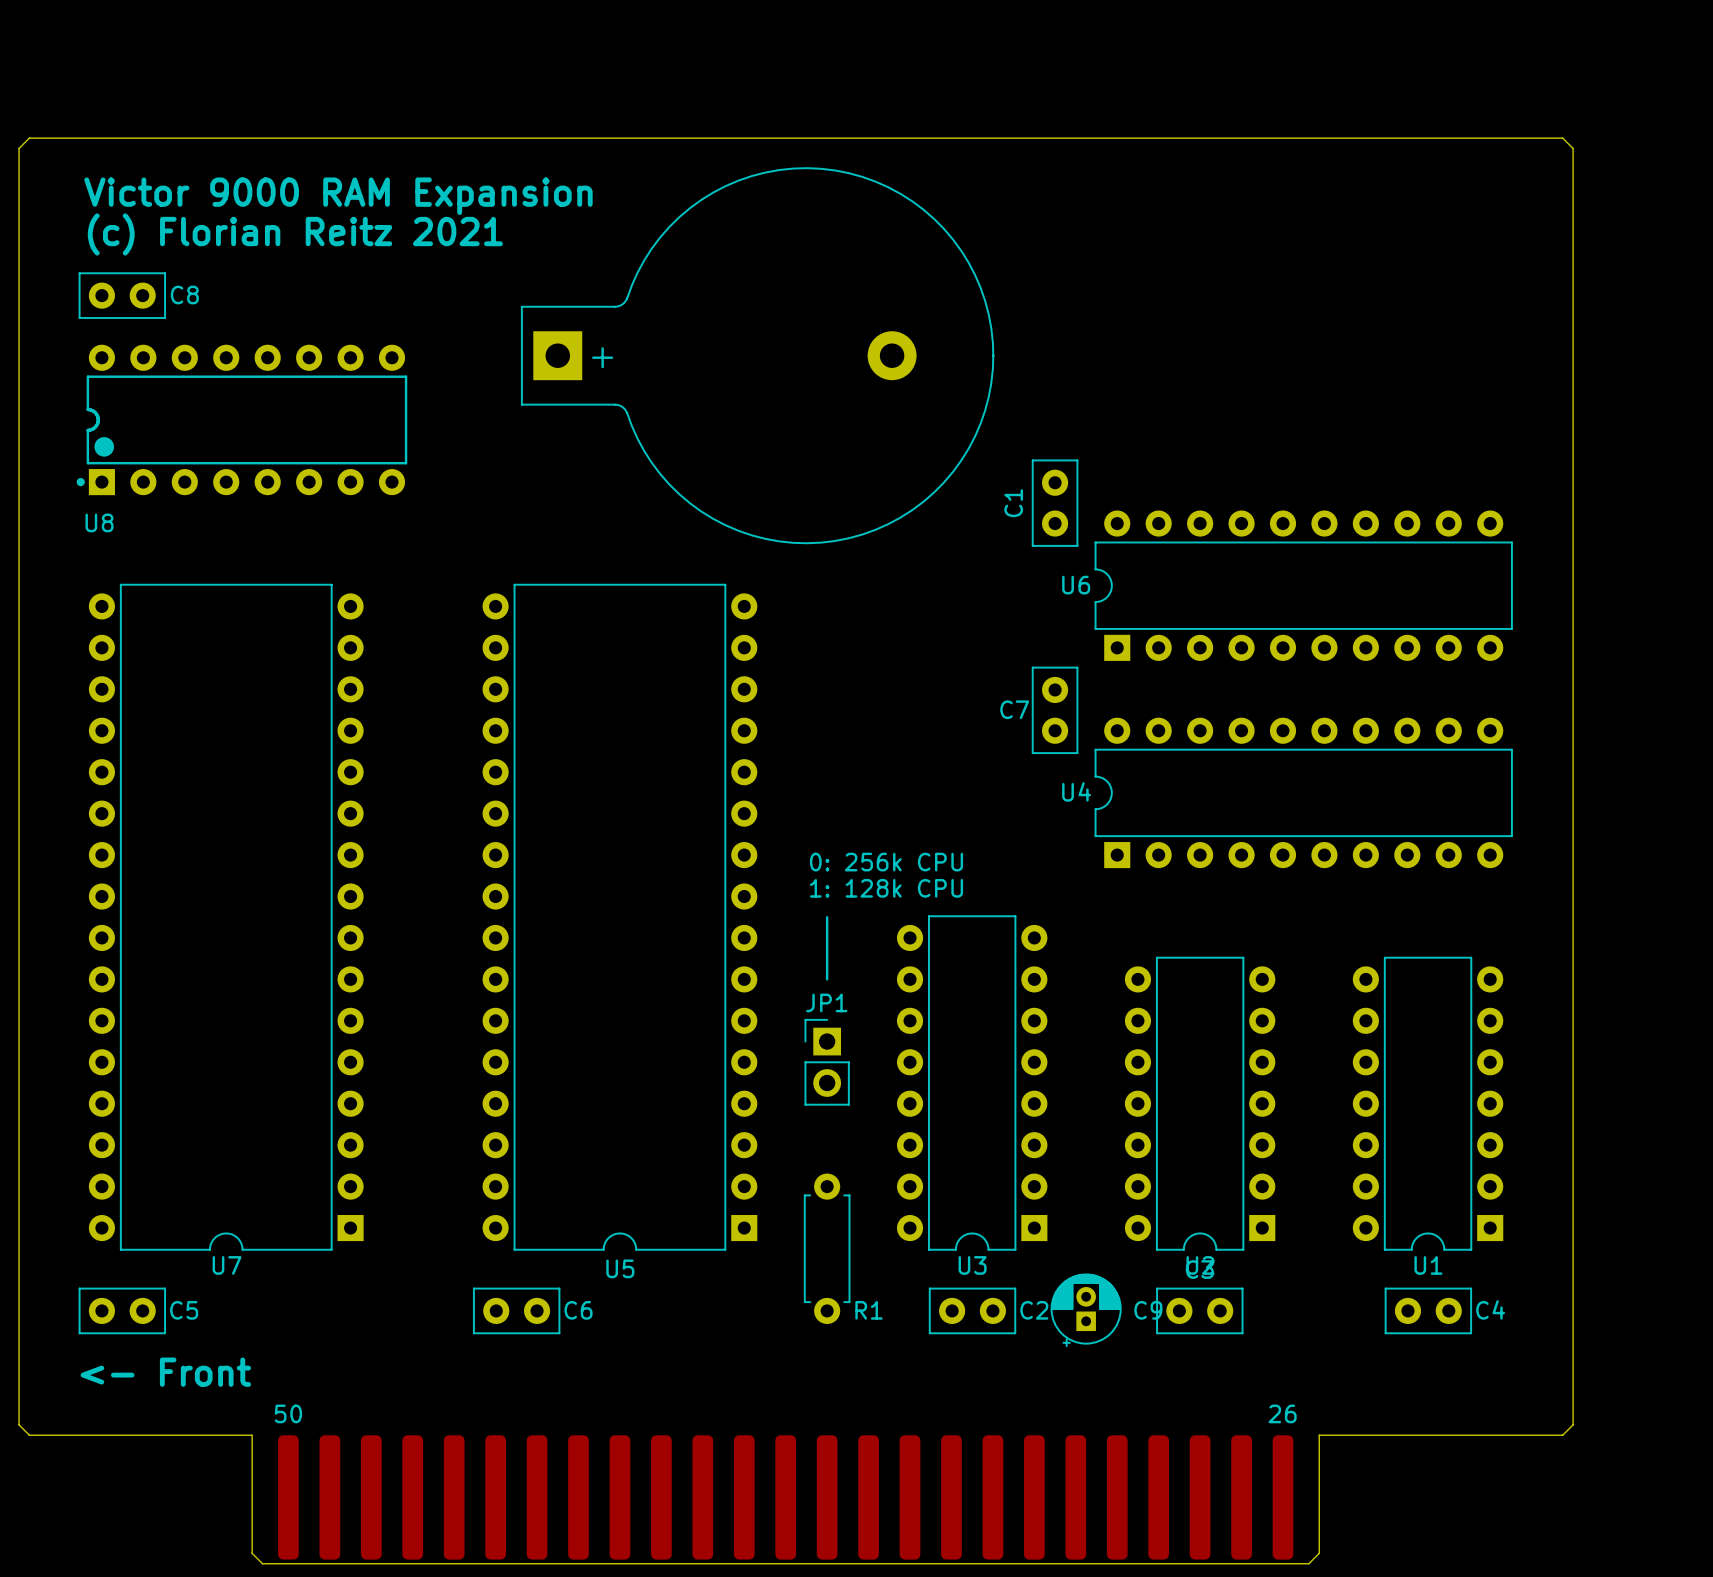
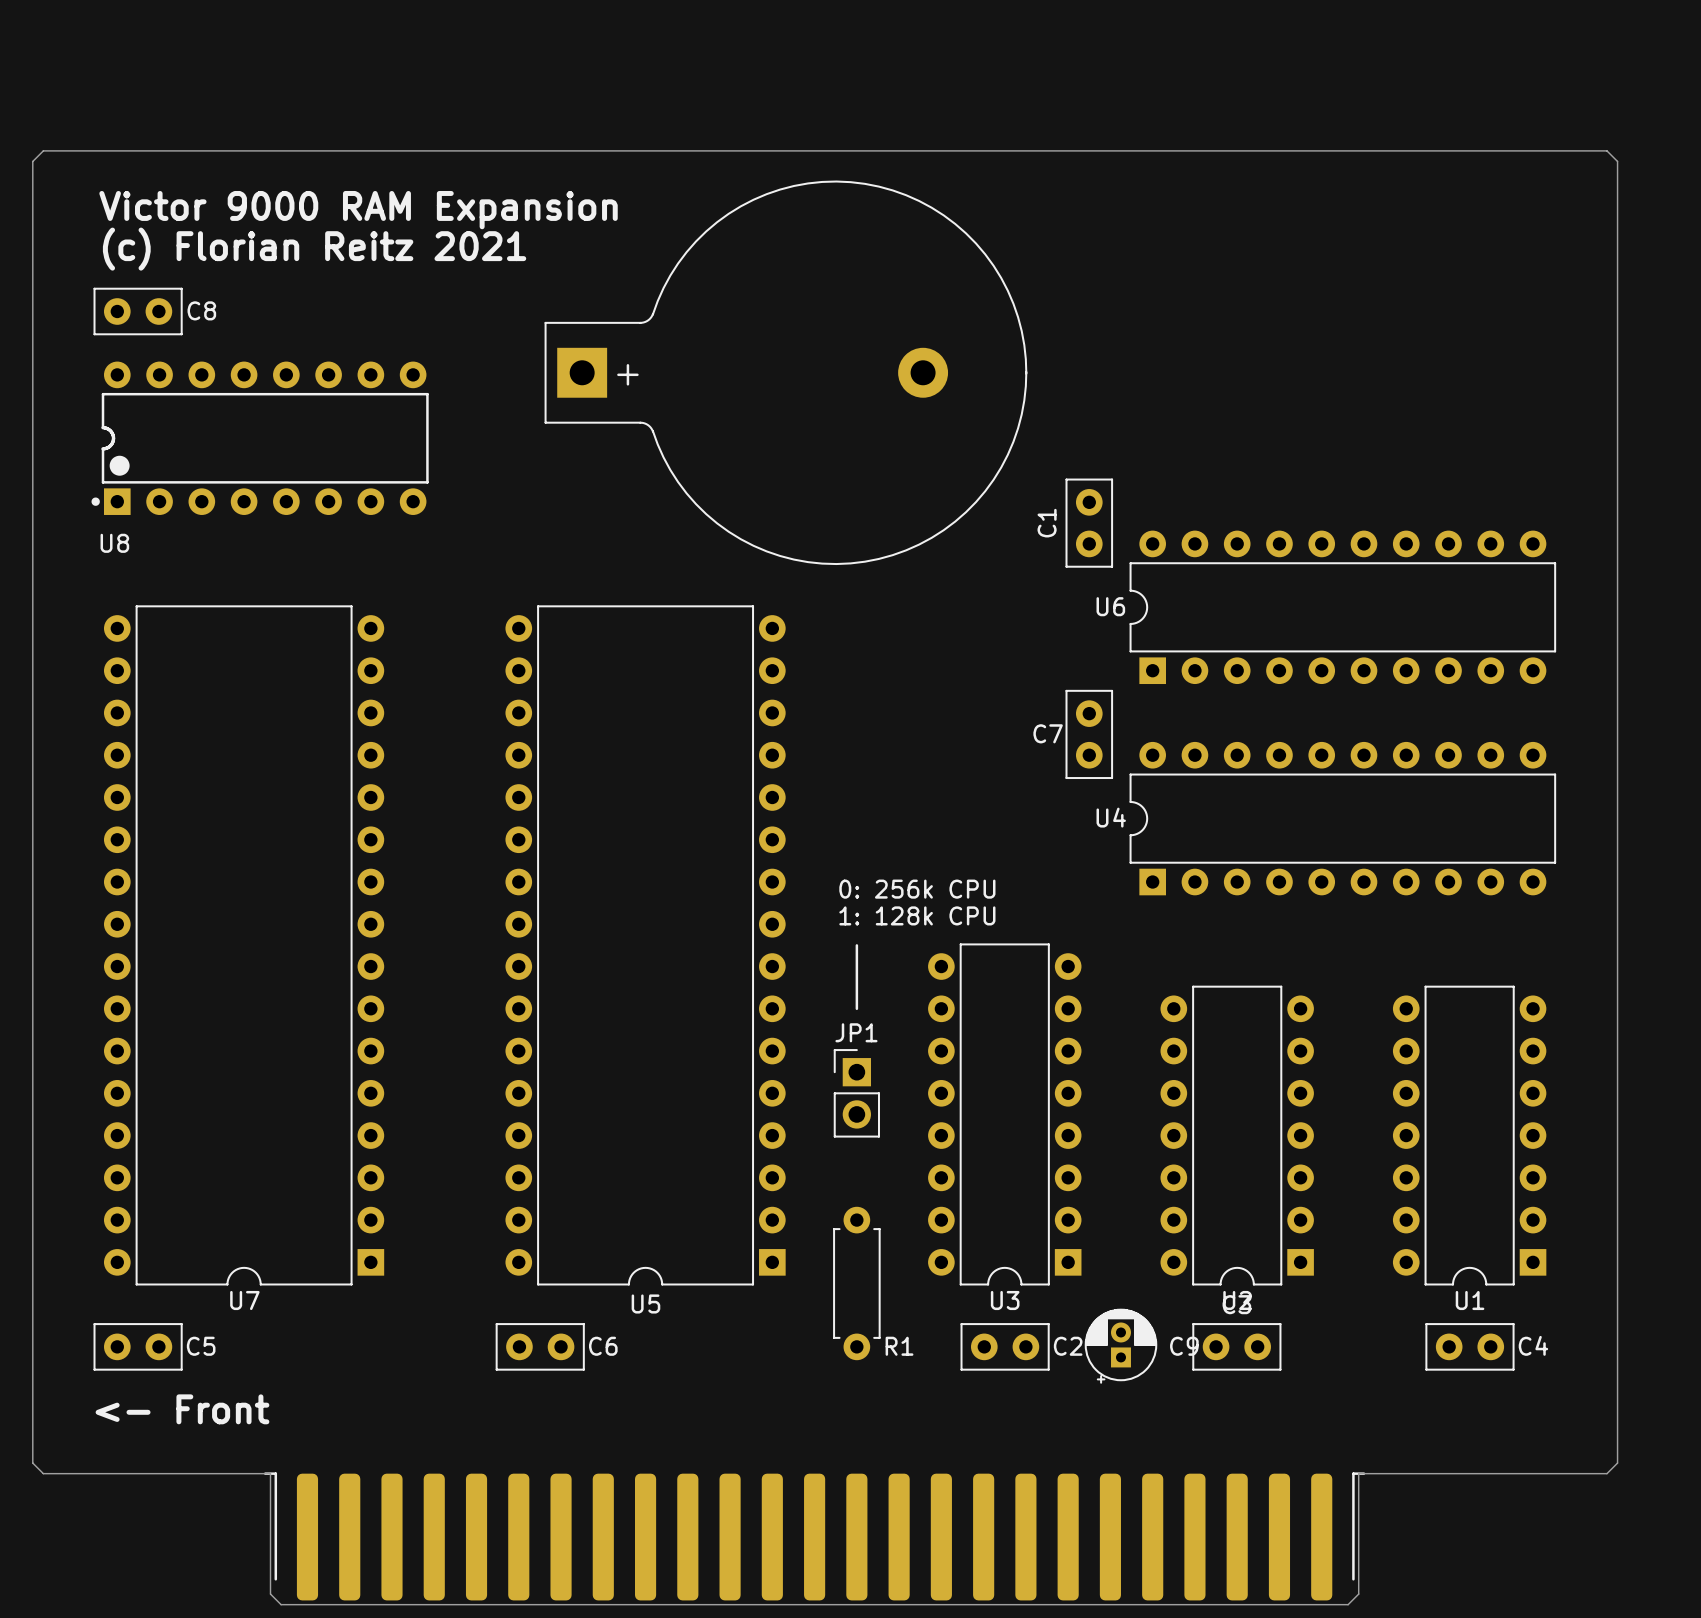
text: 50 (288, 1413) -> none
text: 26 (1282, 1413) -> none
part footprint: [278, 1435, 1294, 1560] -> [263, 1472, 1366, 1601]

